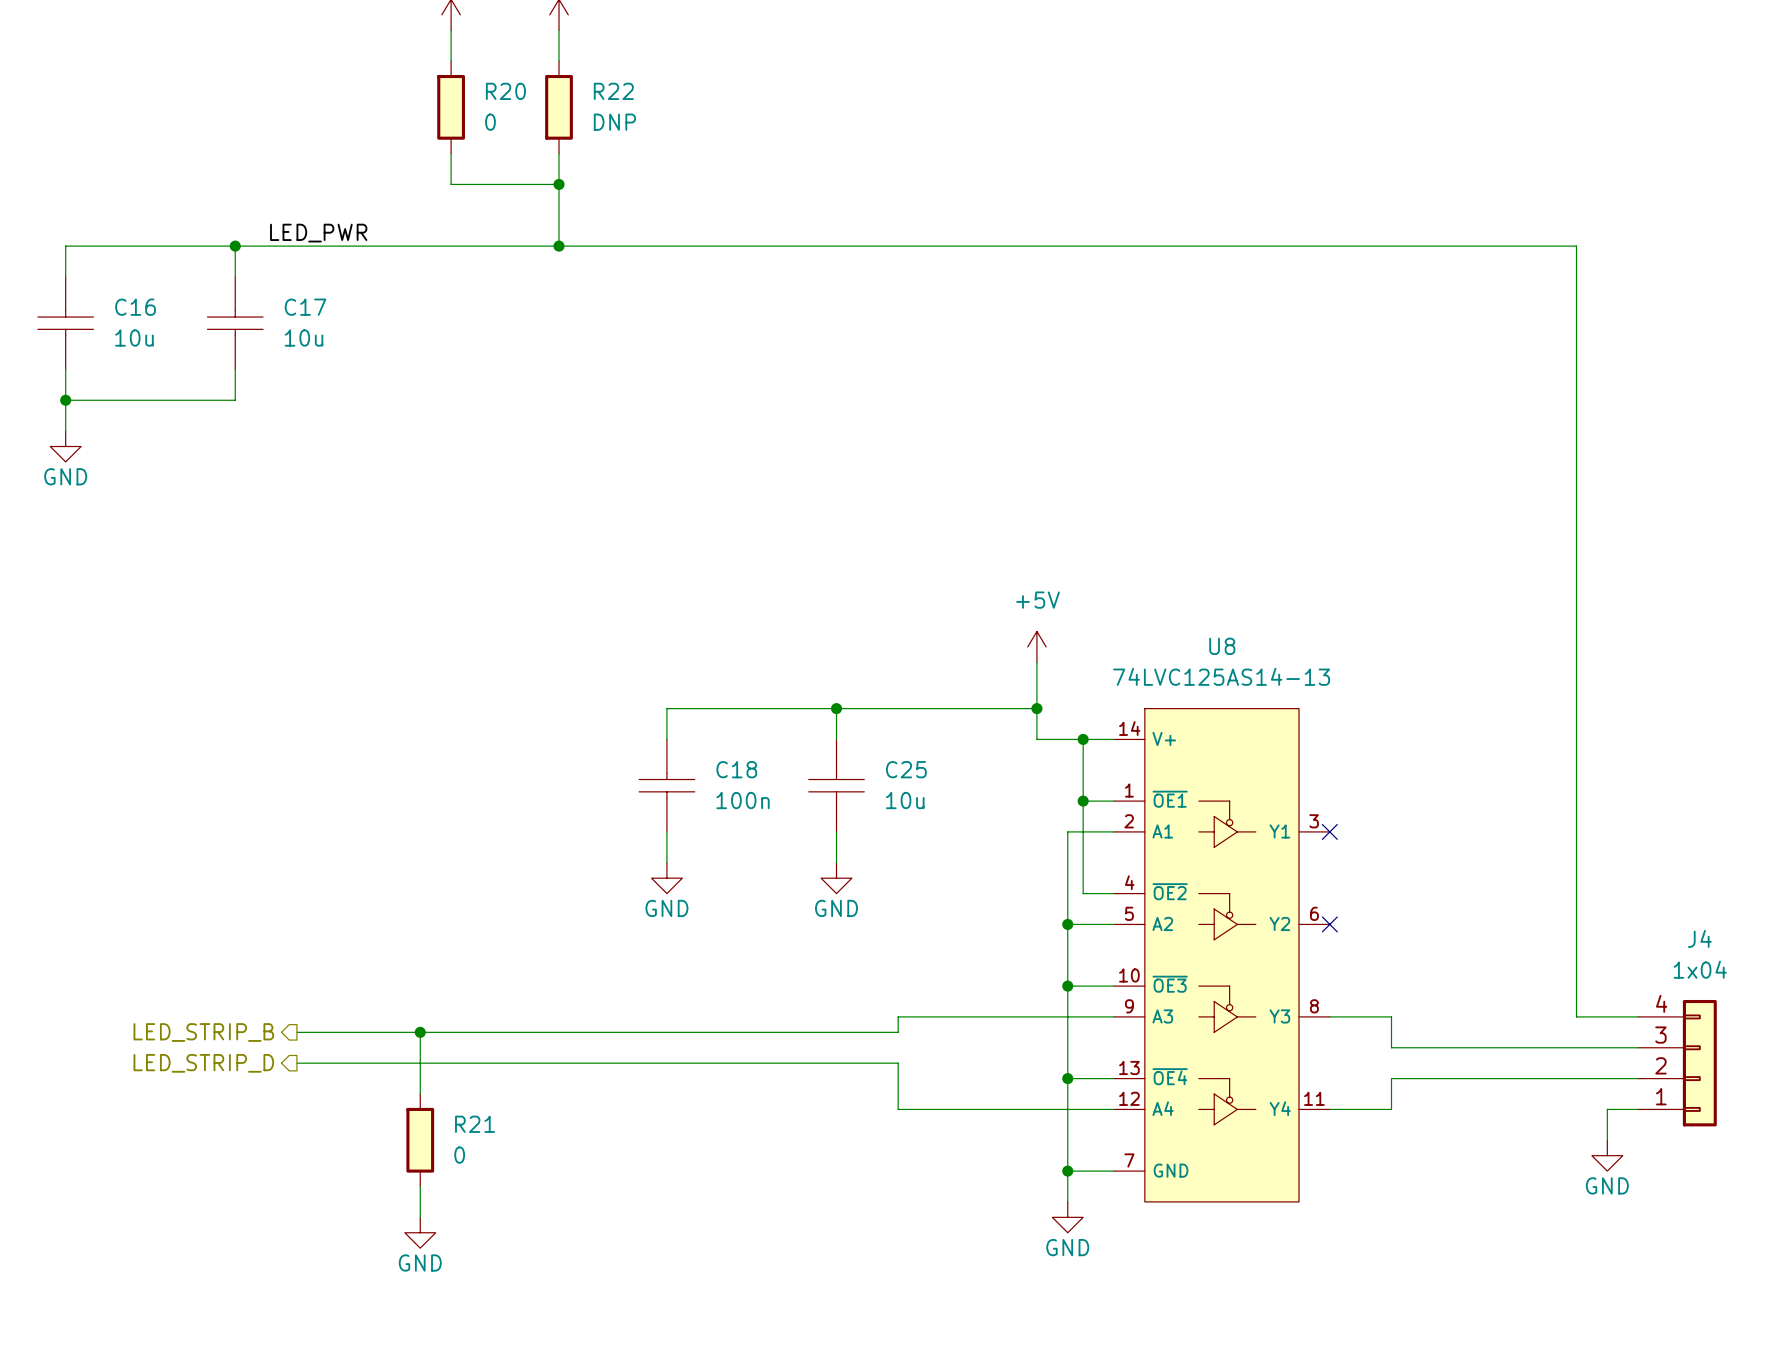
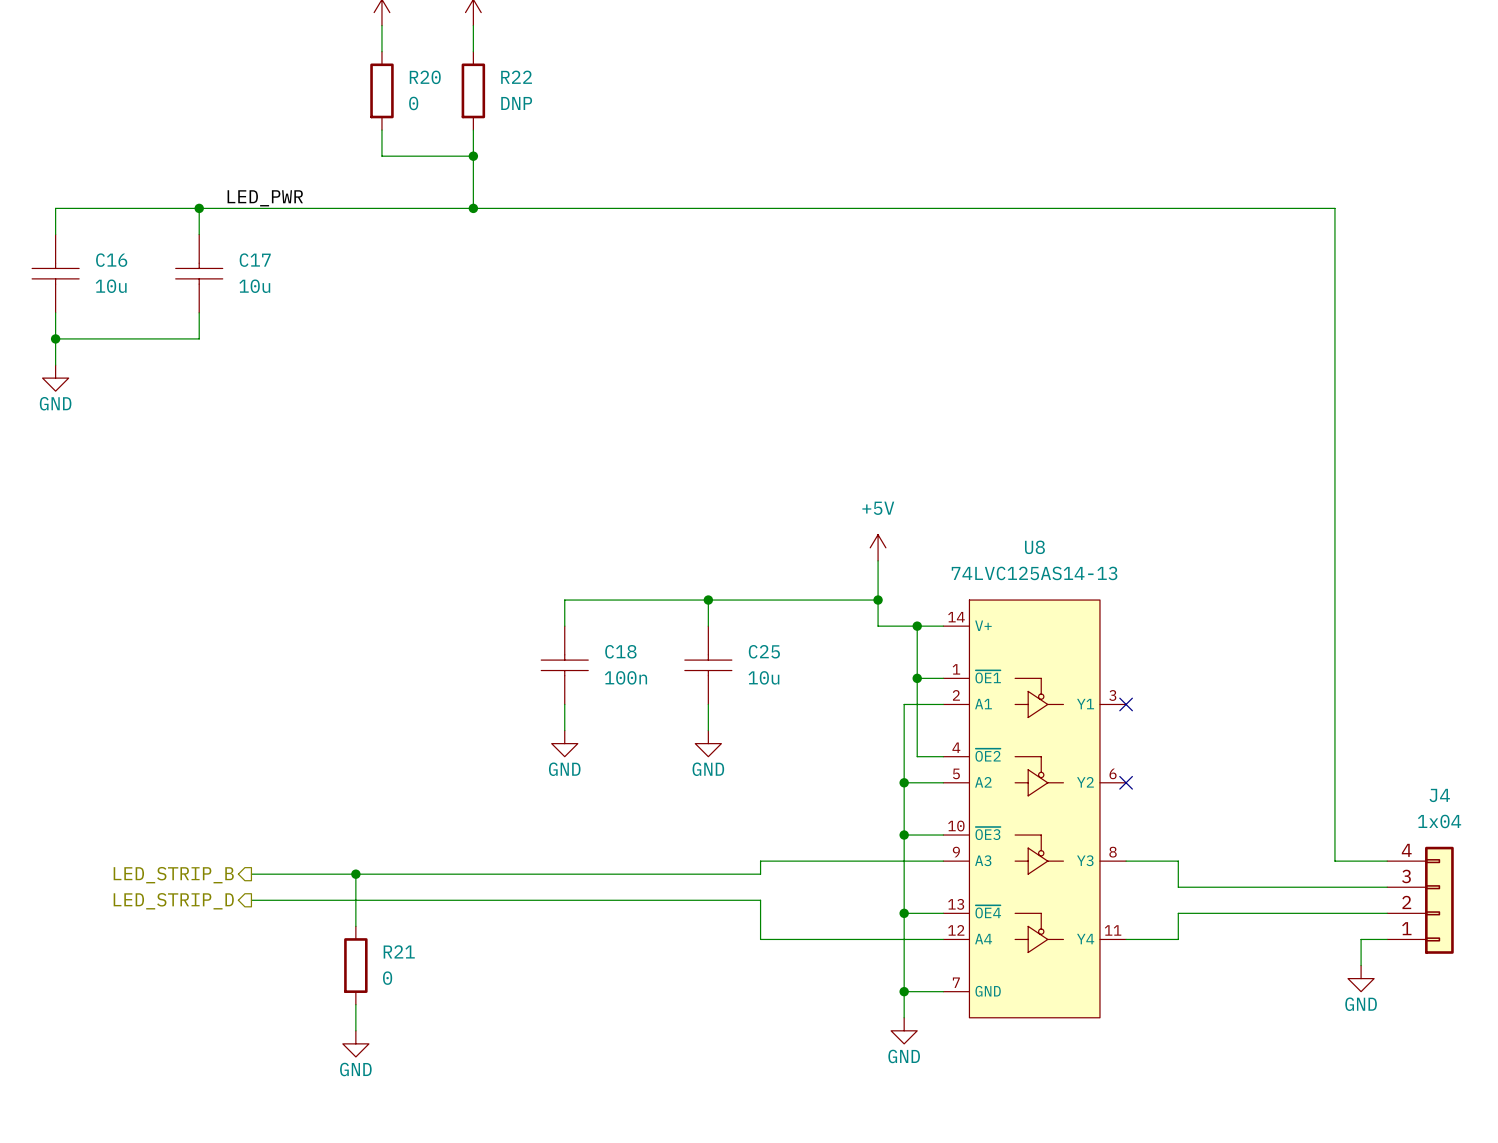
R20 symbol: [437, 61, 465, 154] -> [370, 51, 394, 131]
R22 symbol: [545, 61, 573, 154] -> [461, 51, 486, 131]
R21 symbol: [406, 1094, 435, 1187] -> [344, 926, 368, 1005]

